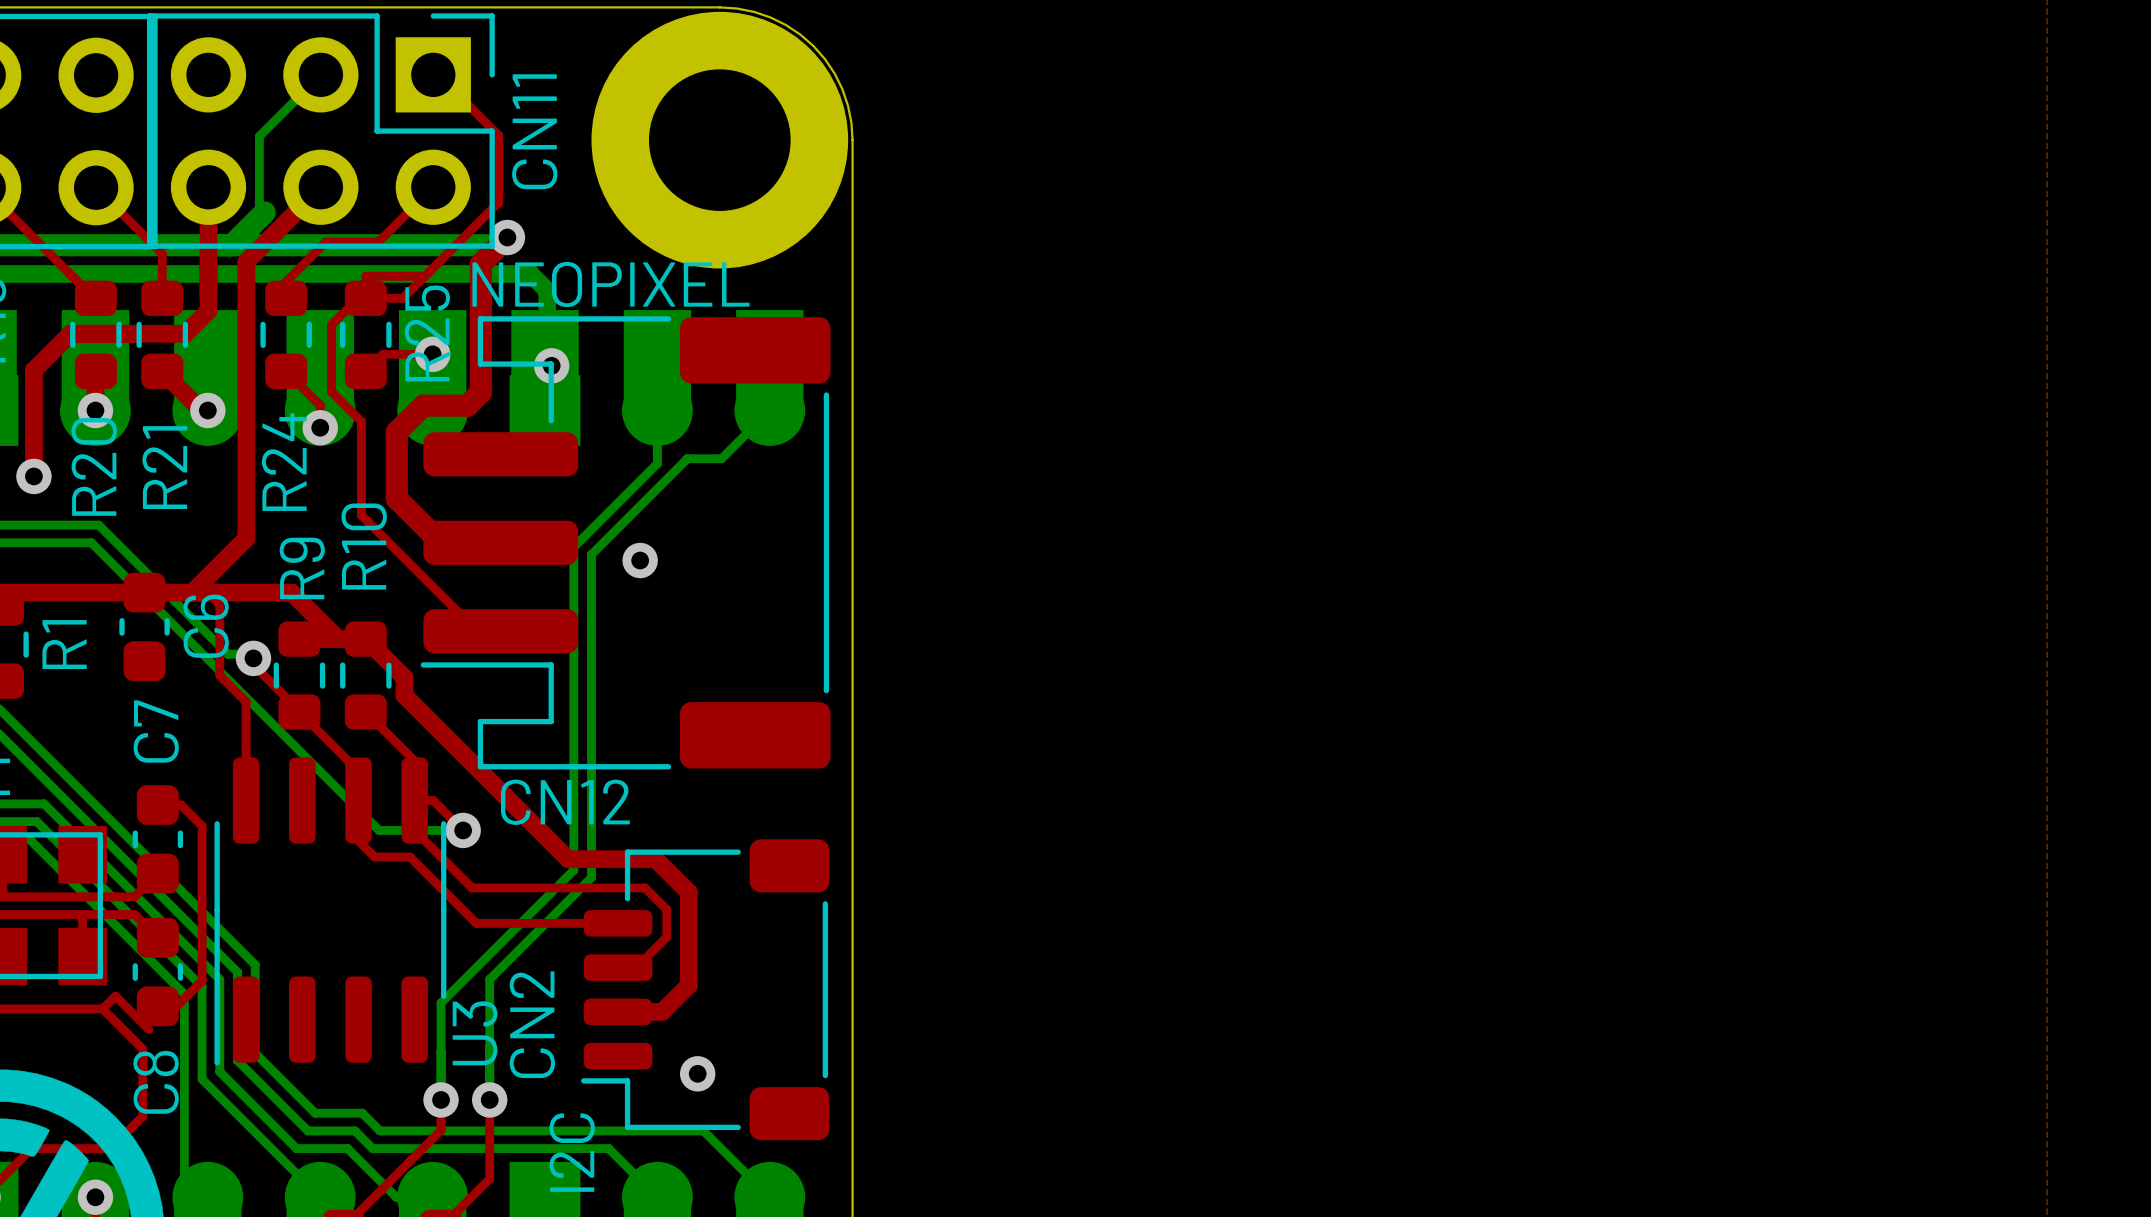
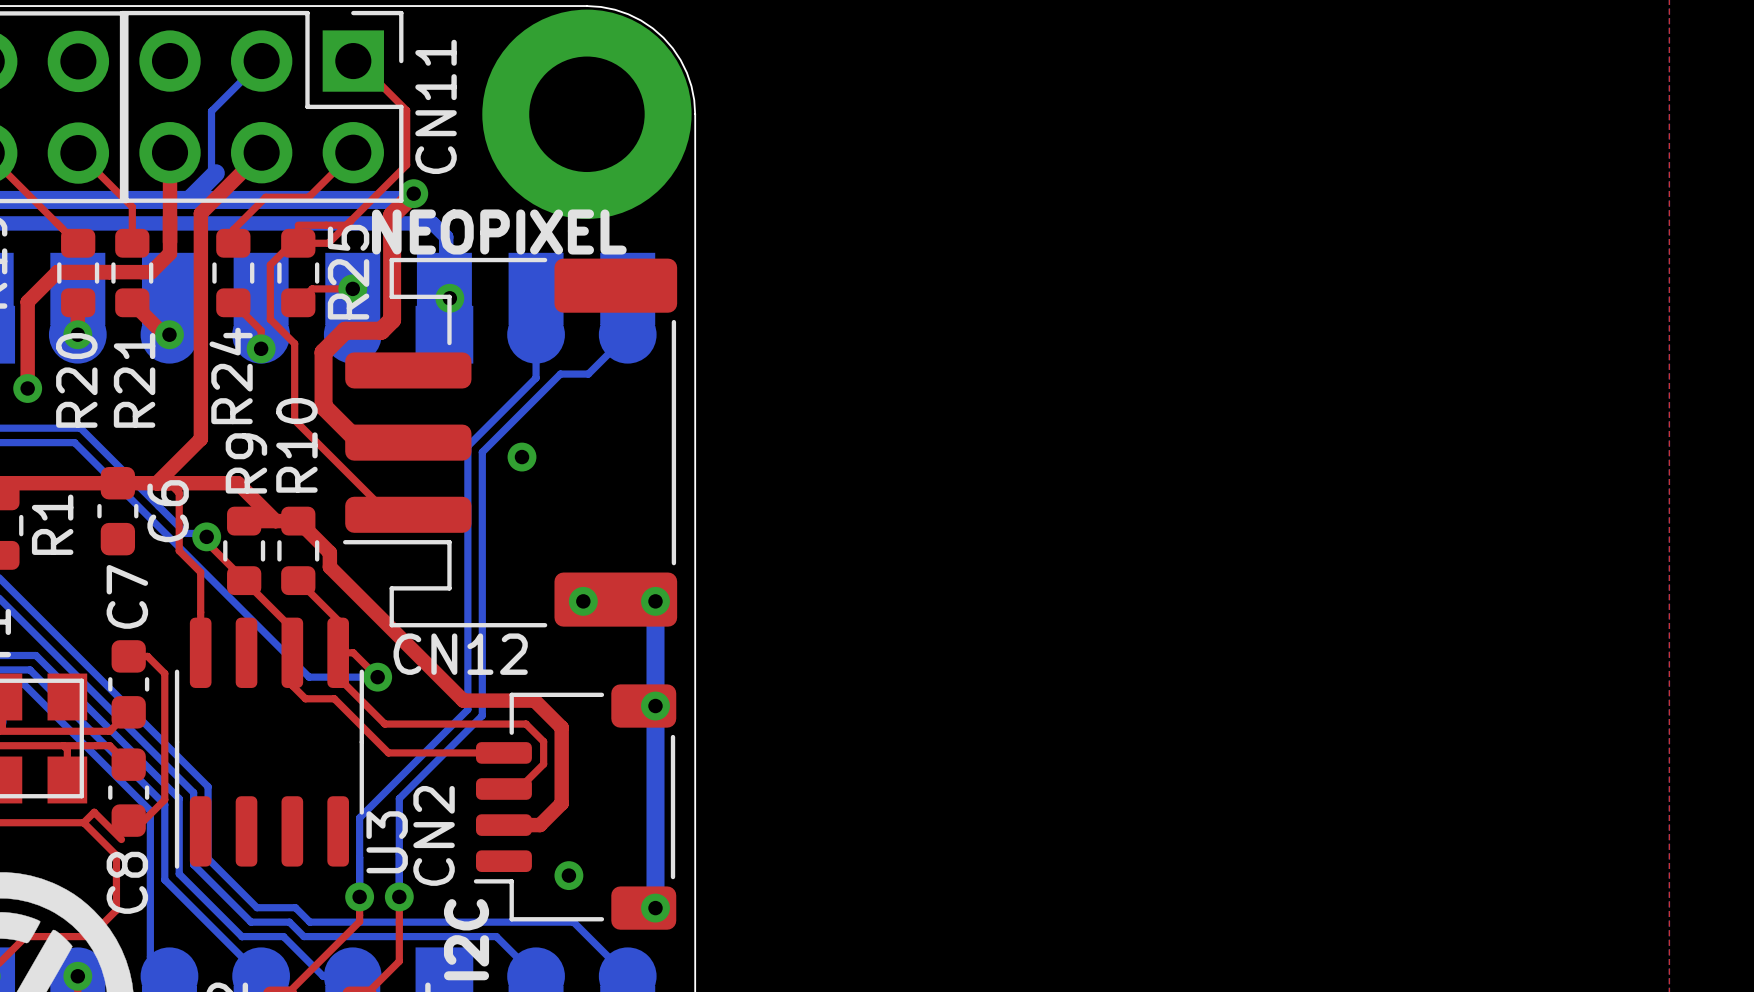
bottom track: none -> (583, 601) (655, 601) (655, 908)
via: none -> (583, 601)
via: none -> (655, 601)
via: none -> (655, 706)
via: none -> (655, 908)

